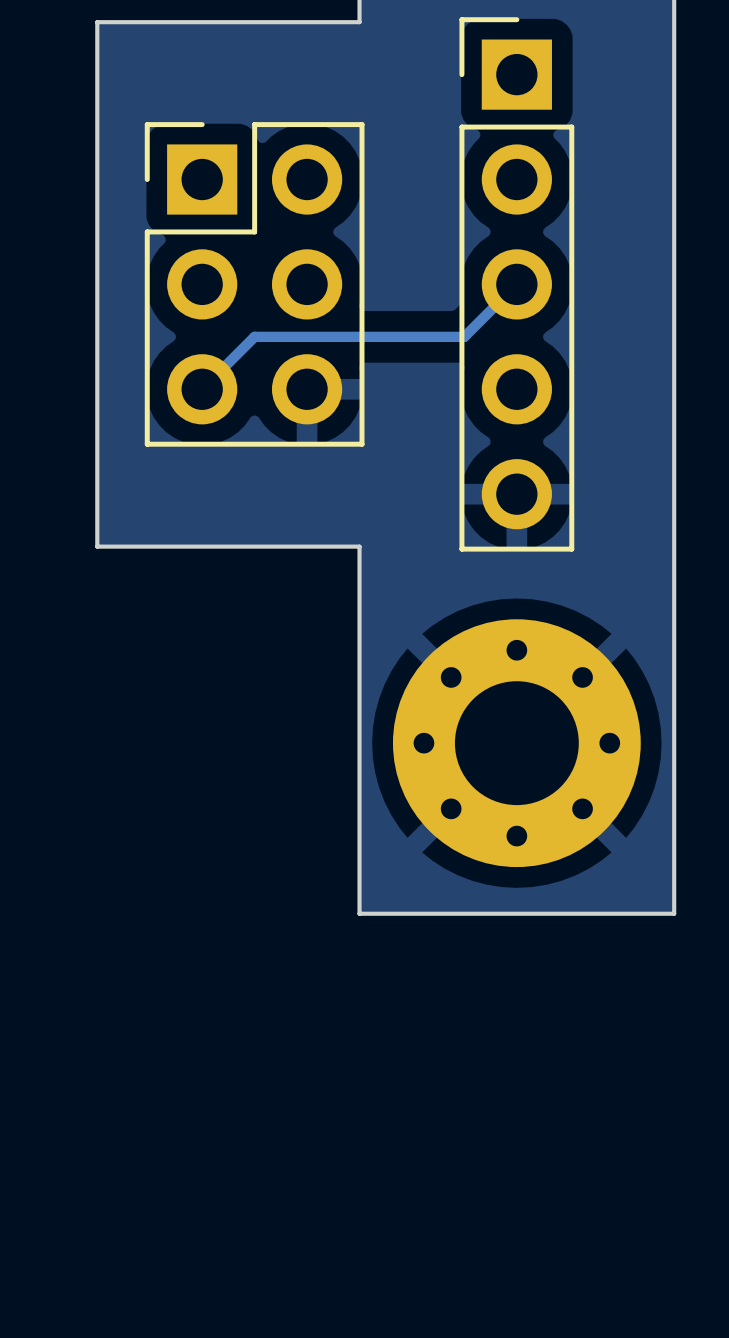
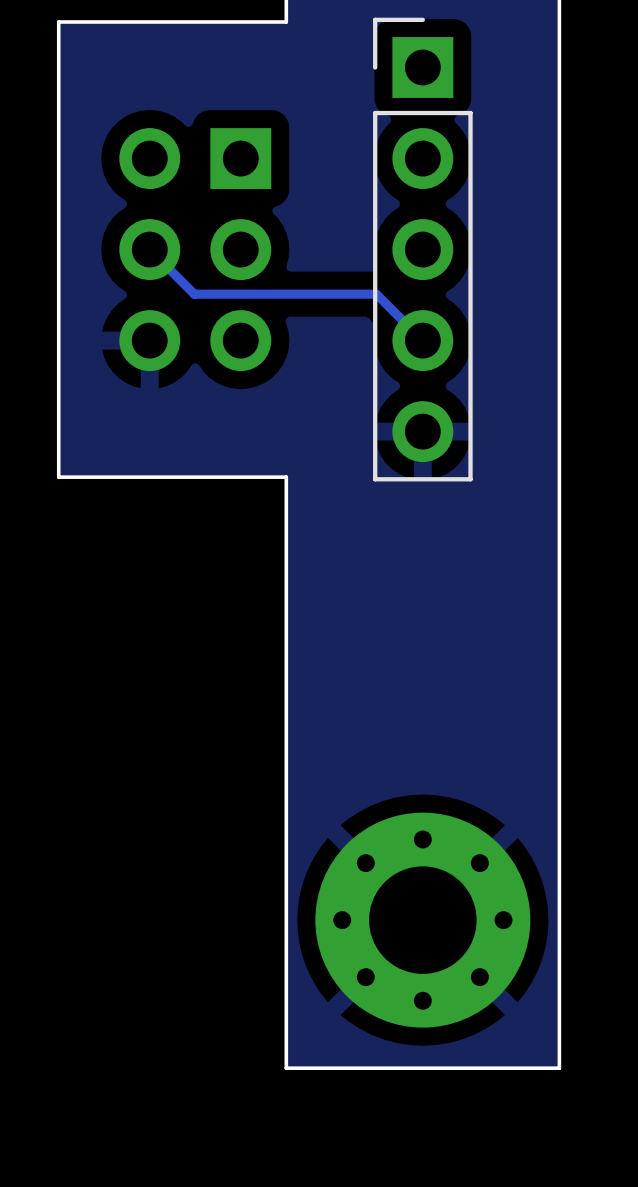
track: none -> (149, 249) (194, 294) (376, 294) (422, 340)
part side: bottom (254, 284) -> top (195, 249)
track: (516, 284) (464, 336) (254, 336) (202, 389) -> none
part position: (516, 743) -> (422, 920)
board edge: (674, 913) (359, 913) -> (559, 795) (559, 1068) (286, 1068) (286, 795)

